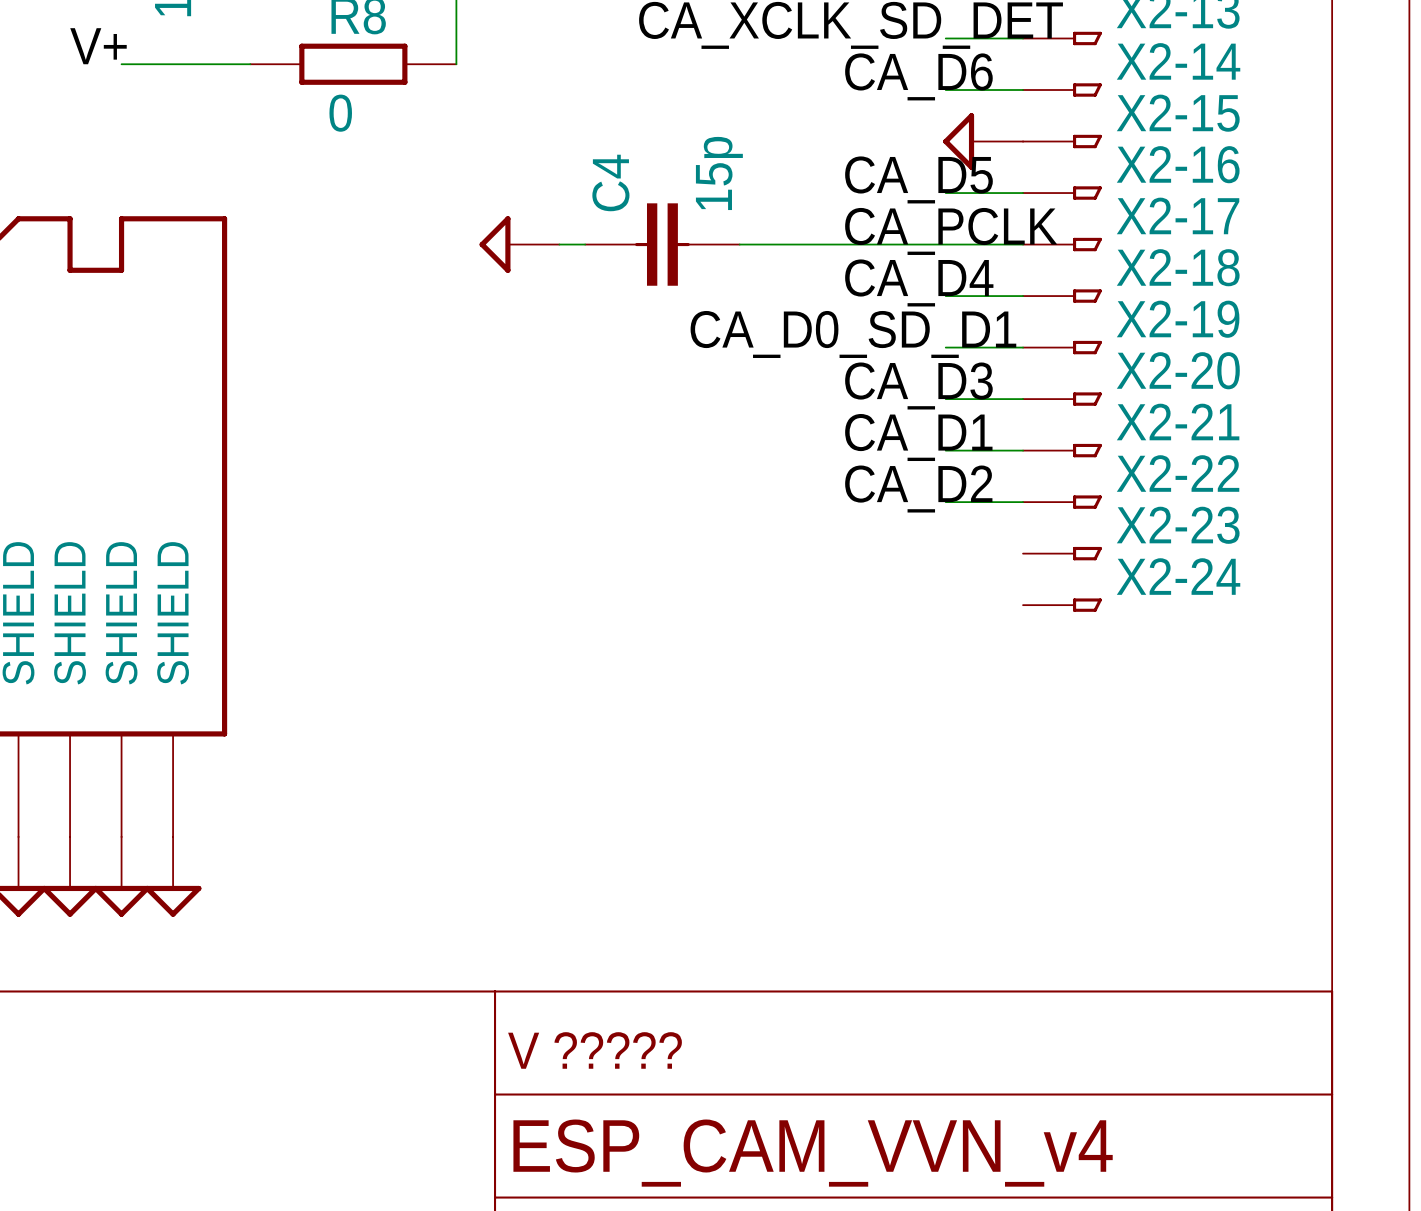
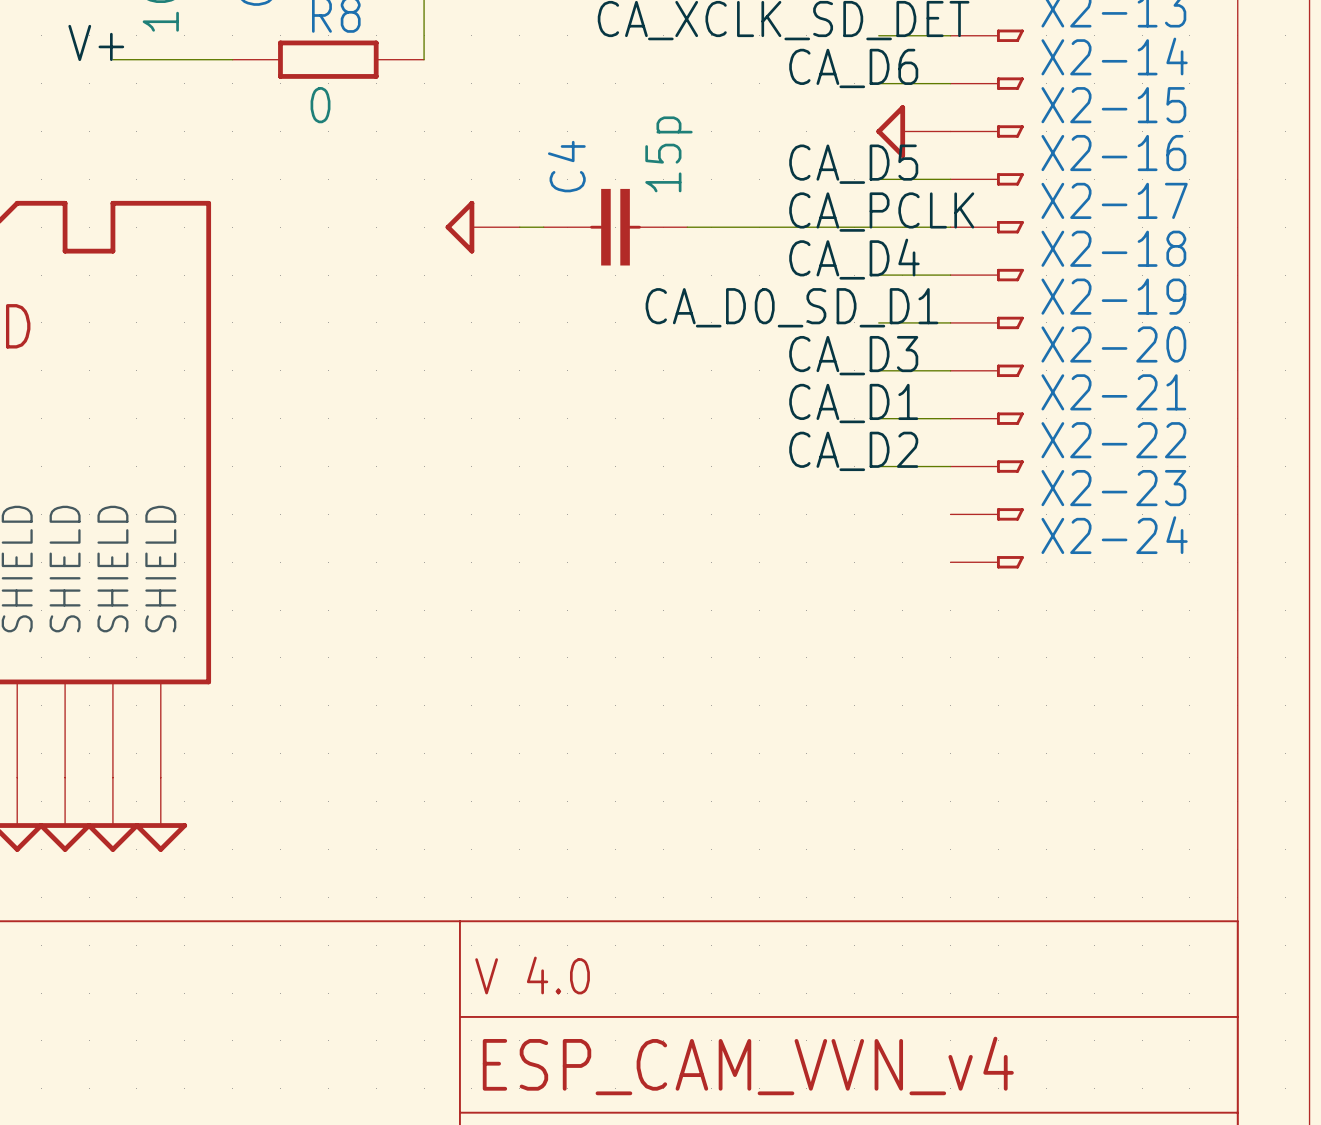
text: V ????? (595, 1050) -> V 4.0 (532, 975)

